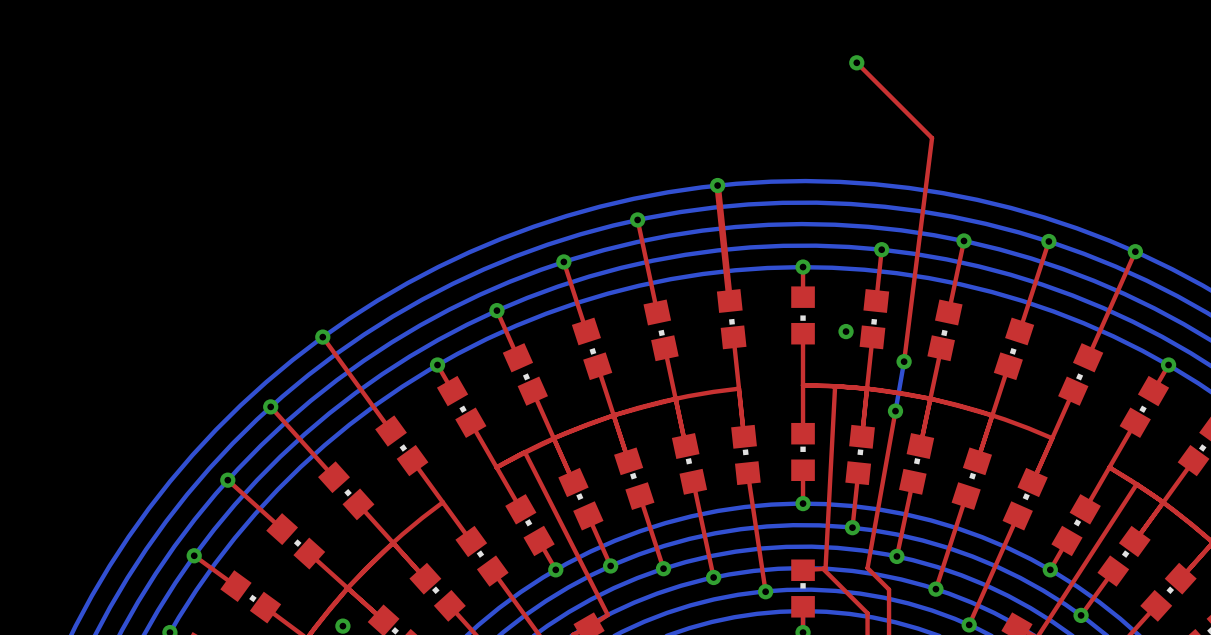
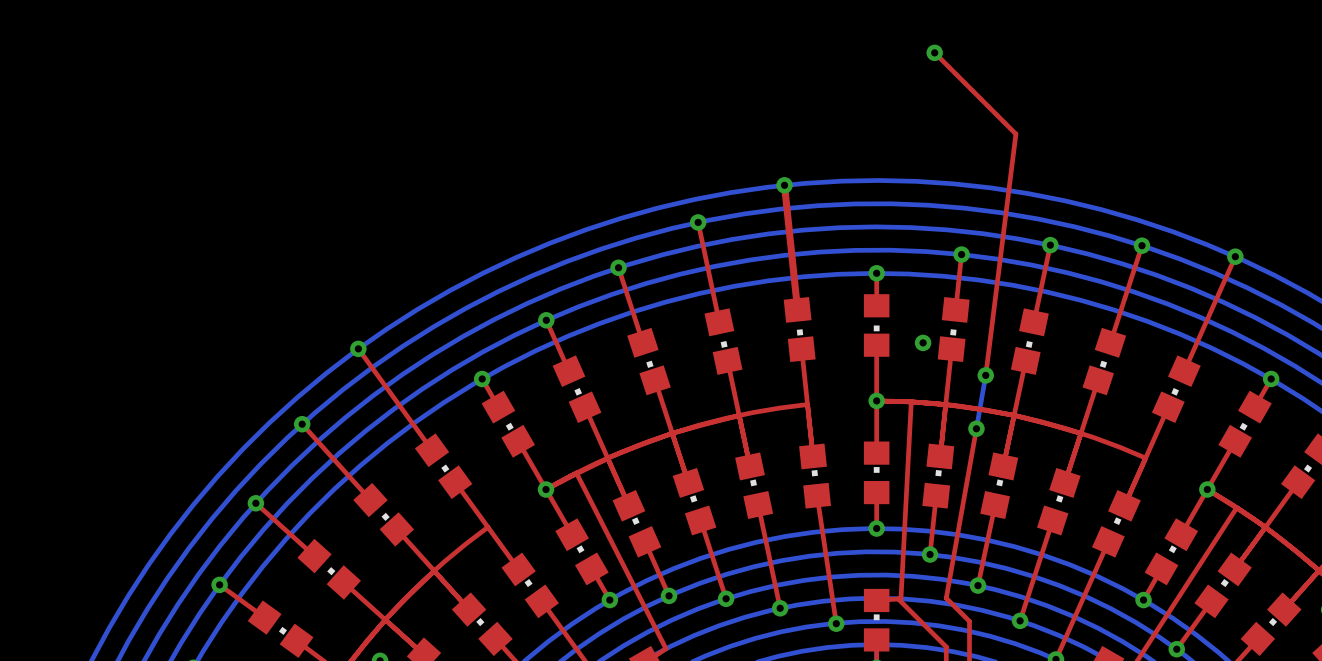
via: none -> (876, 400)
via: none -> (546, 489)
via: none -> (1207, 489)

